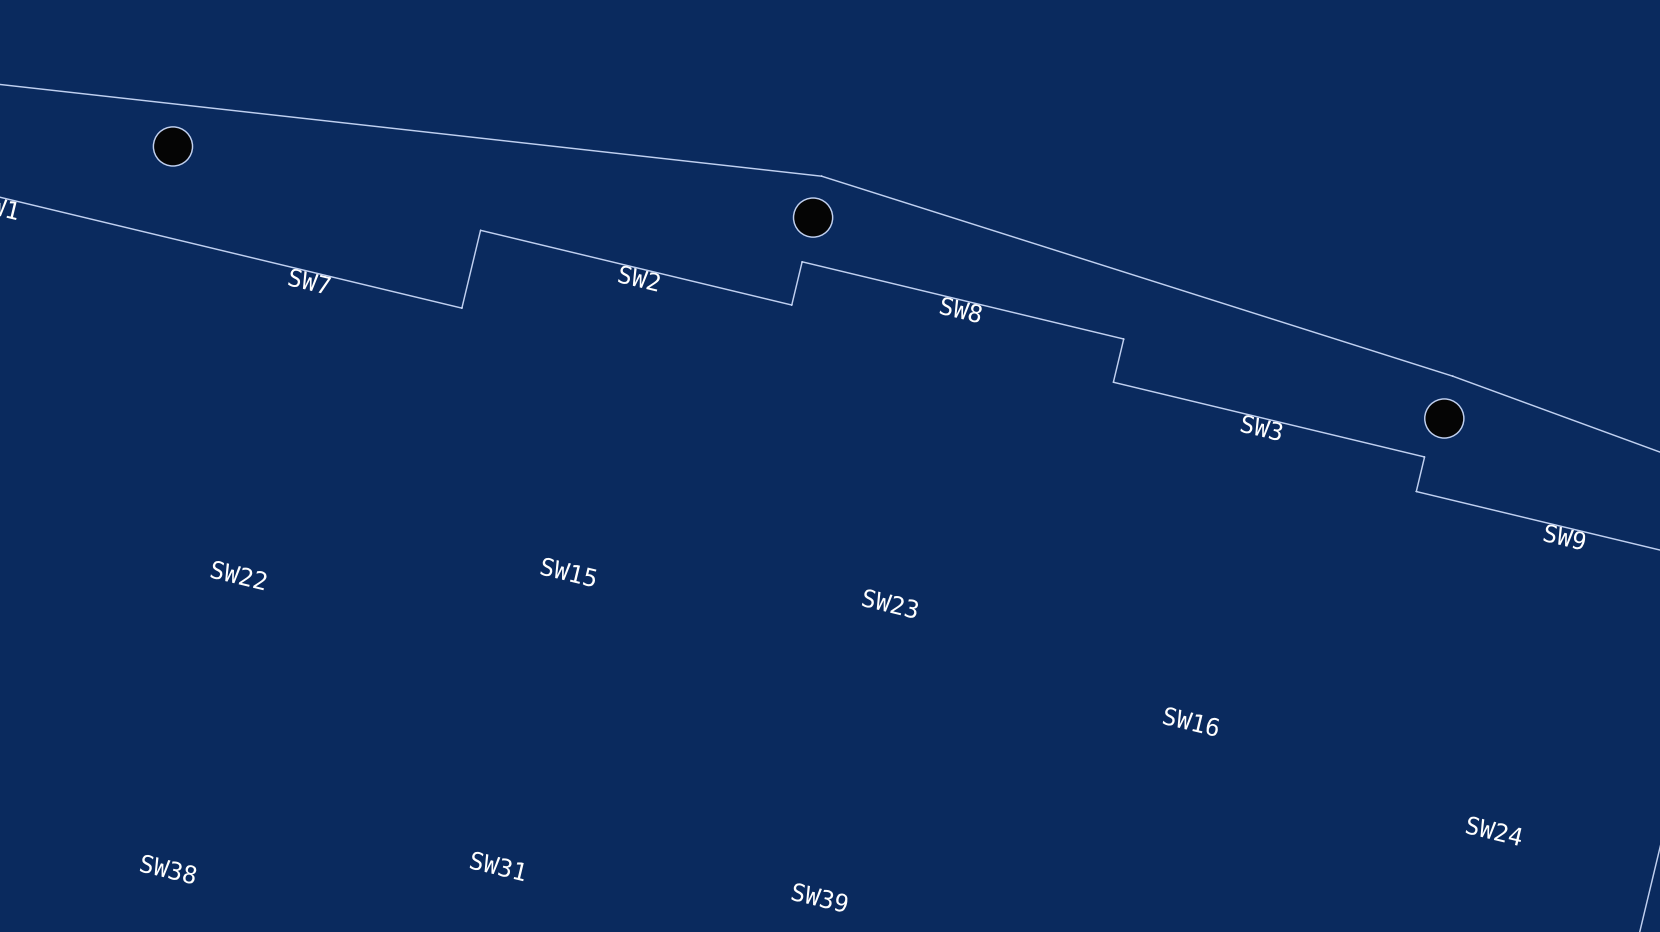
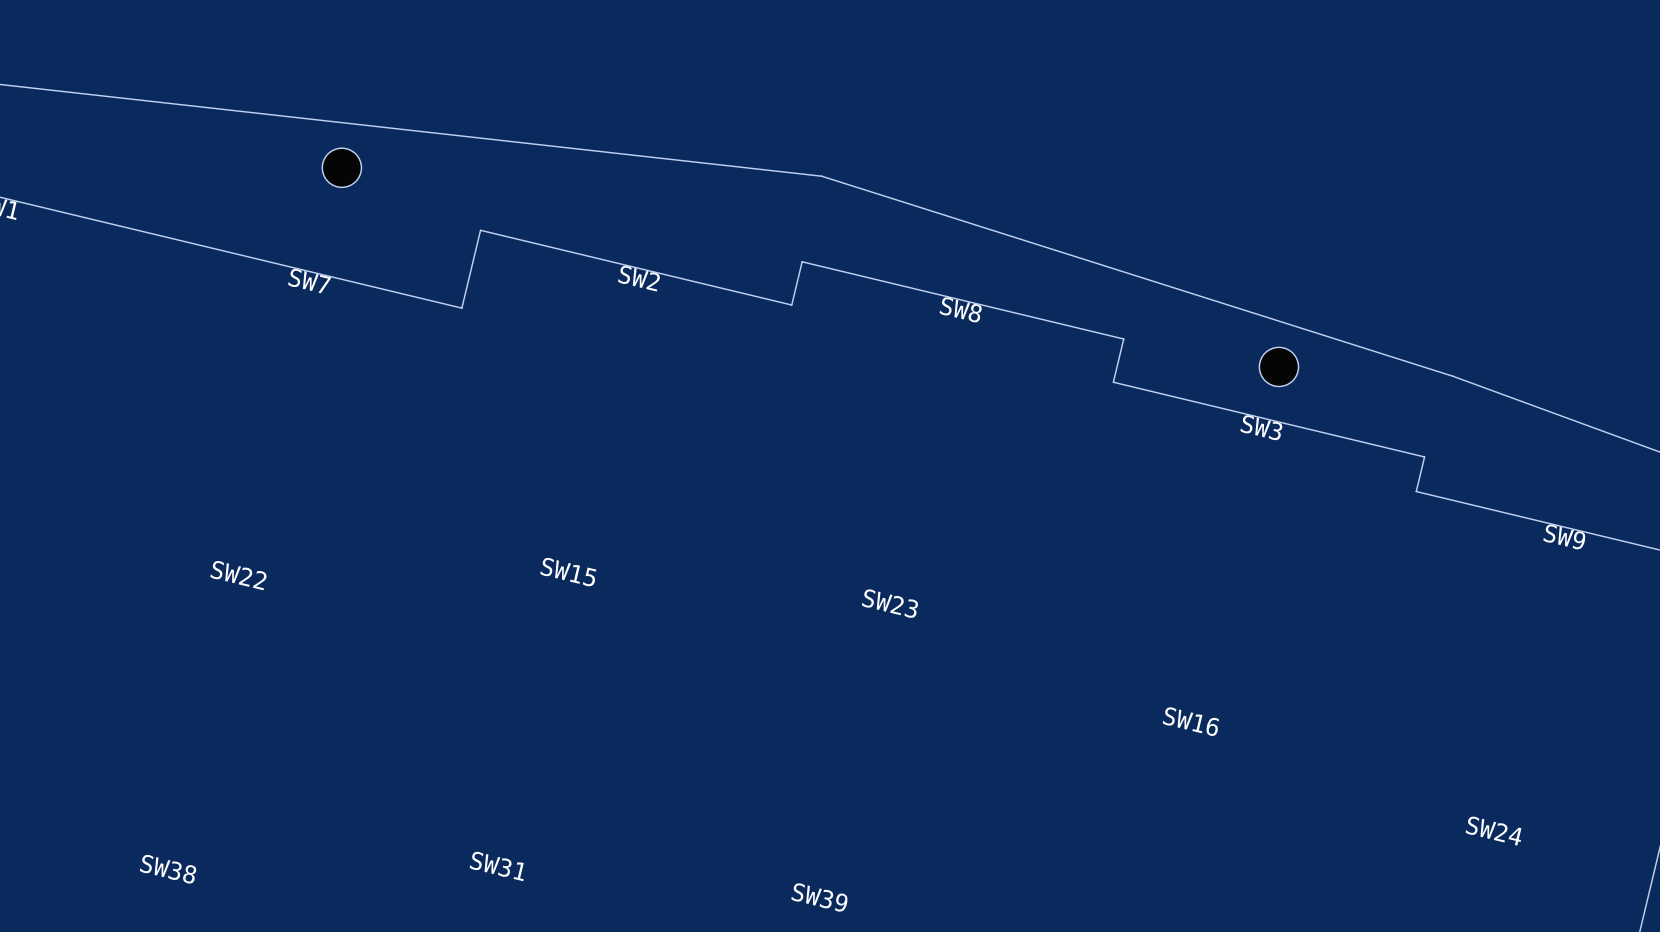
part position: (172, 146) -> (341, 167)
part: (813, 217) -> none
part position: (1444, 418) -> (1278, 366)

